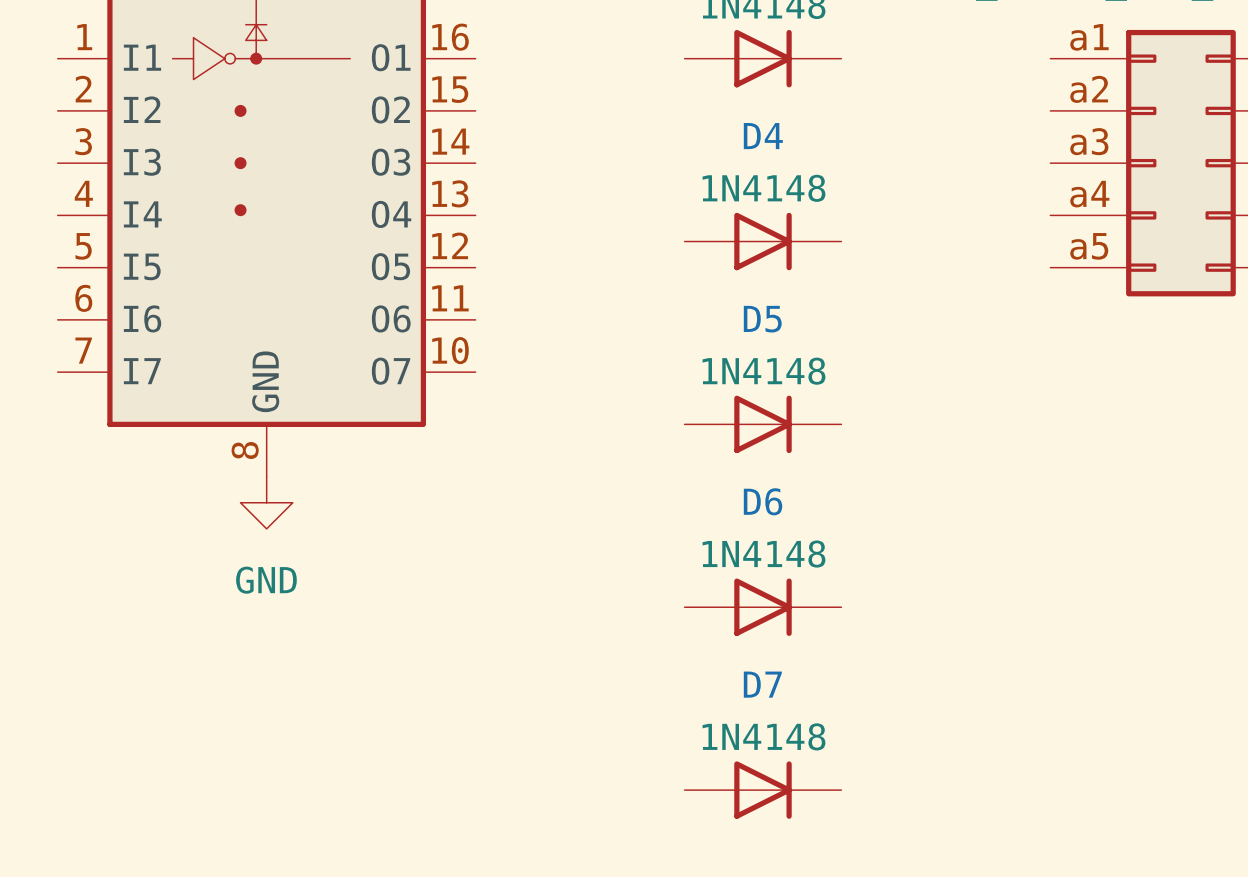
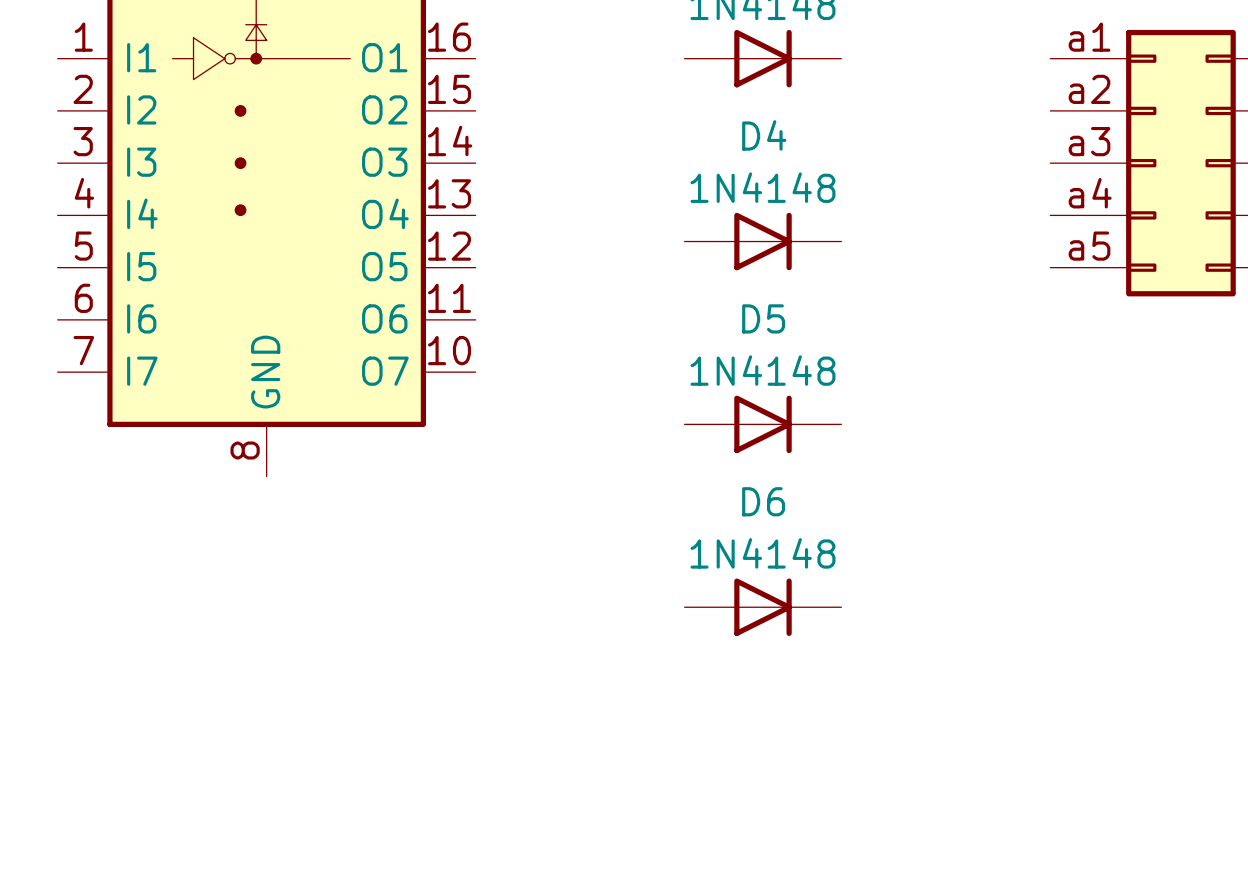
power symbol: GND (266, 502) -> none
D7: 1N4148 (762, 790) -> none

